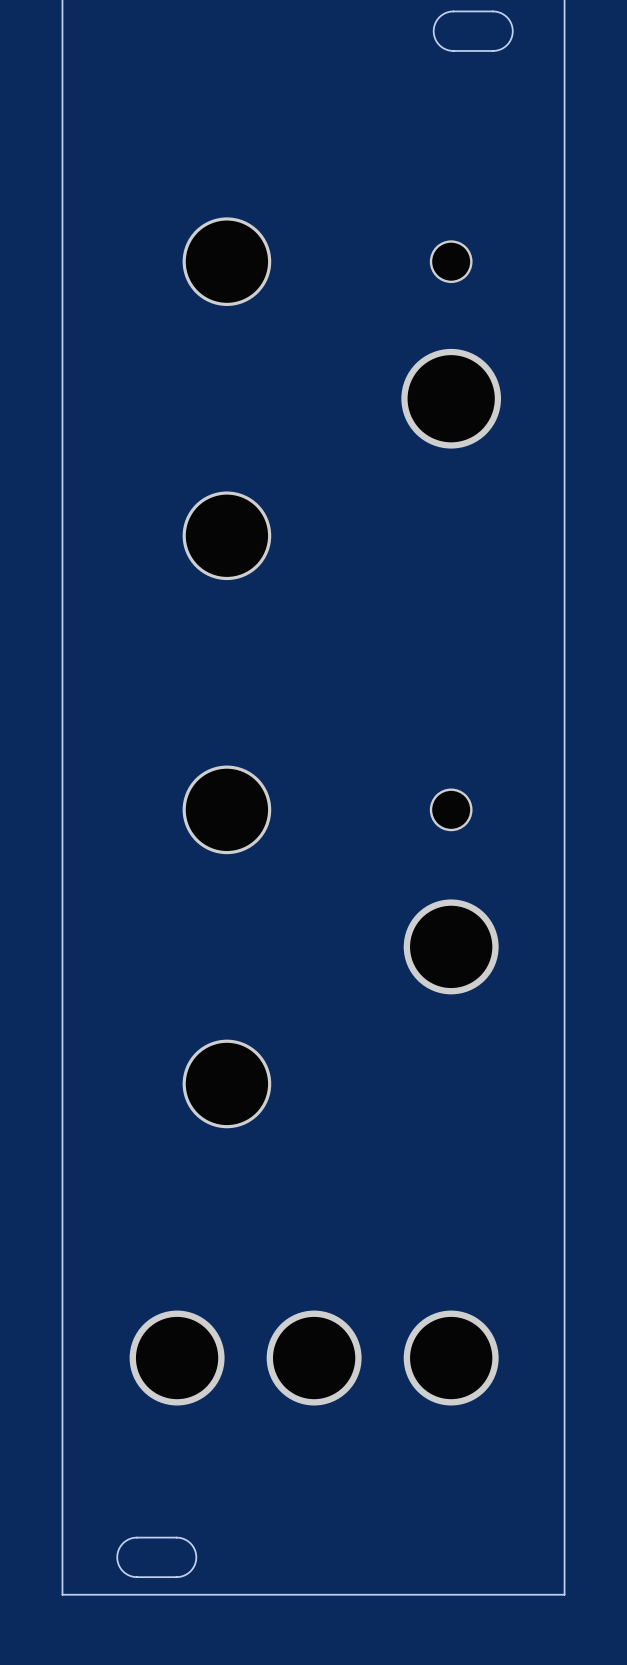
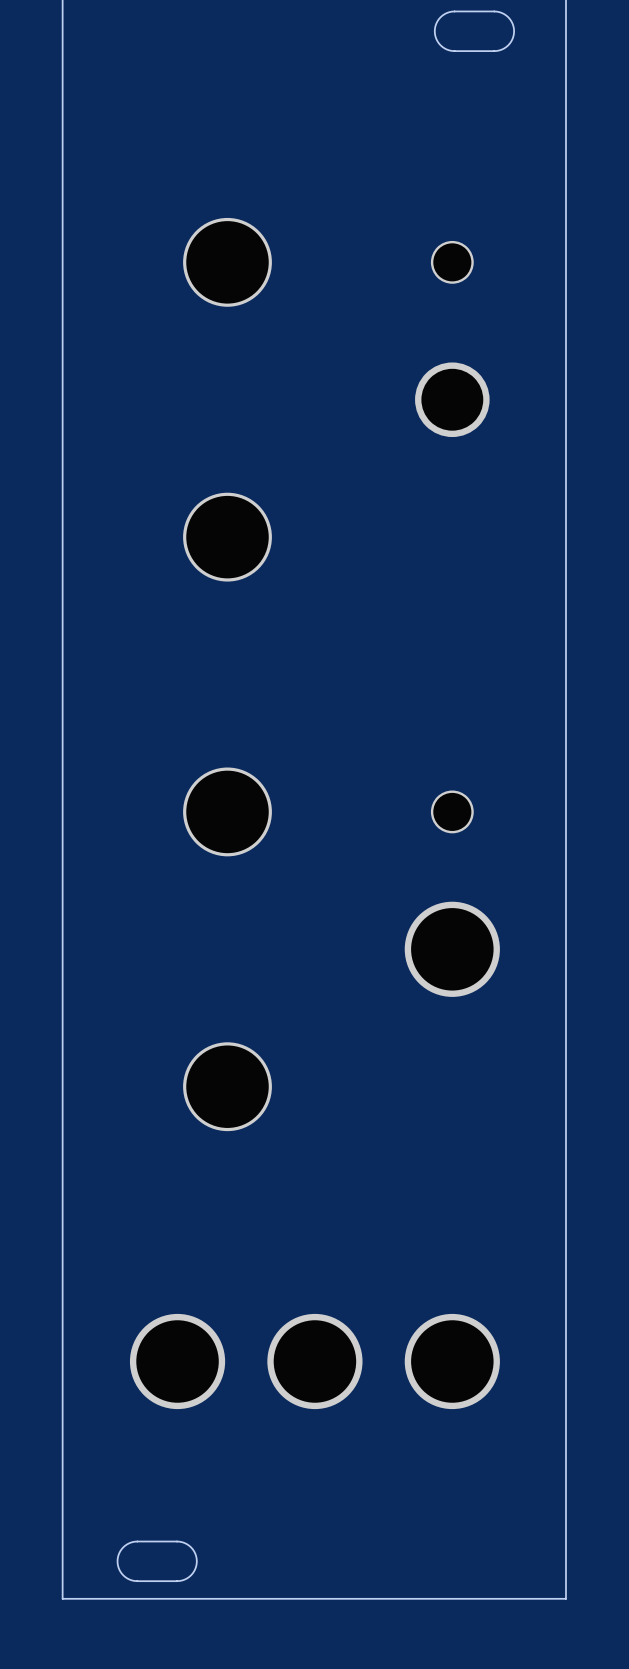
part footprint: [401, 348, 502, 449] -> [415, 362, 490, 438]

